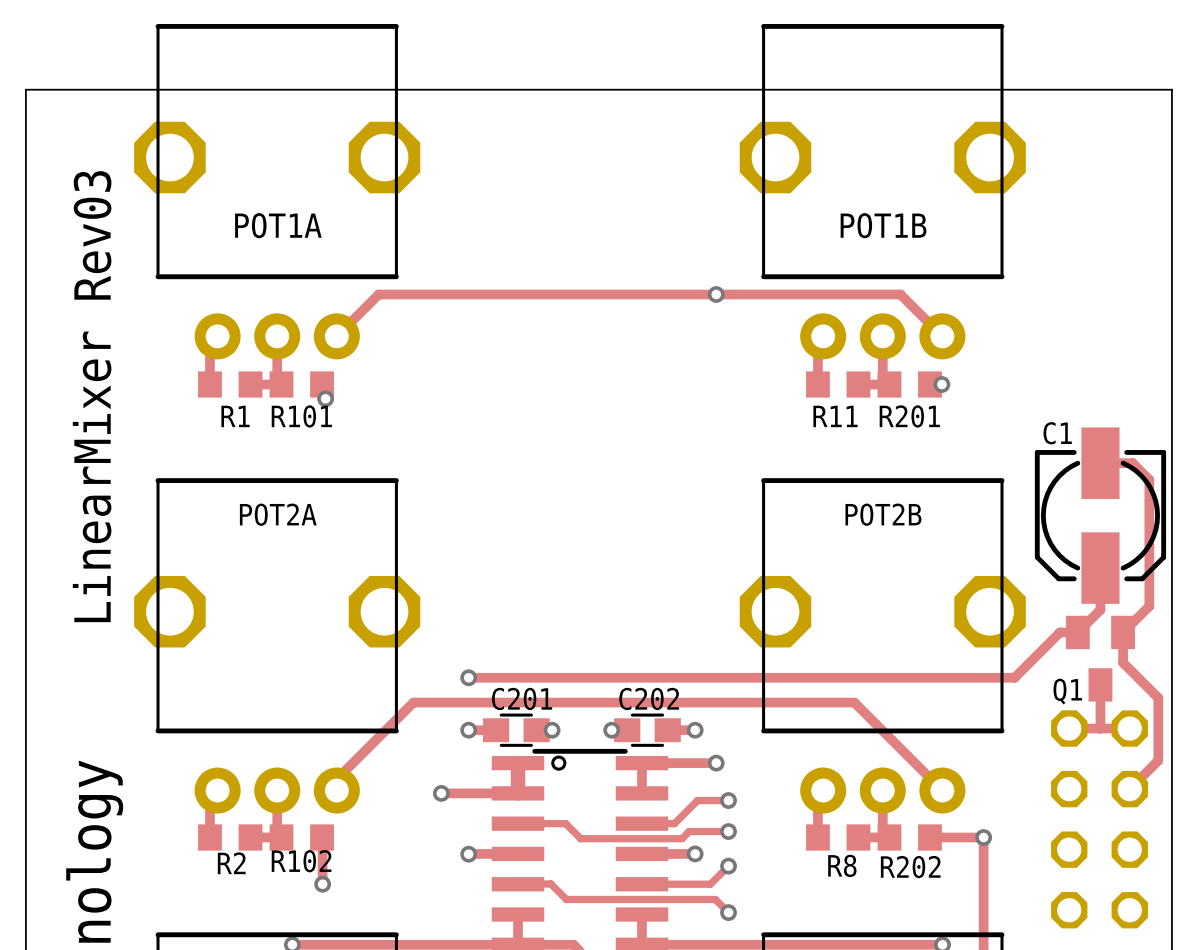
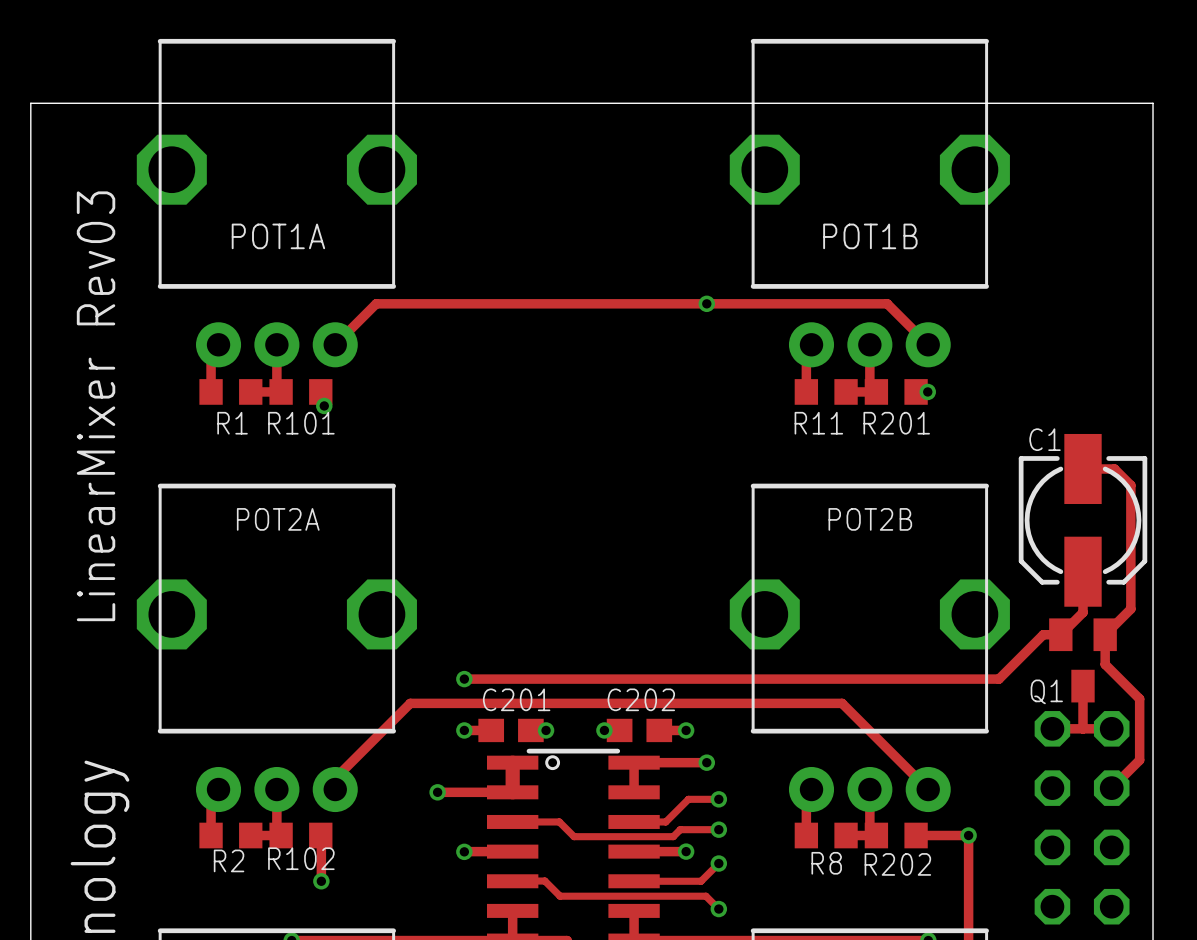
C201 footprint: [482, 713, 550, 747] -> [478, 718, 544, 743]
C202 footprint: [614, 713, 681, 747] -> [606, 718, 673, 743]

